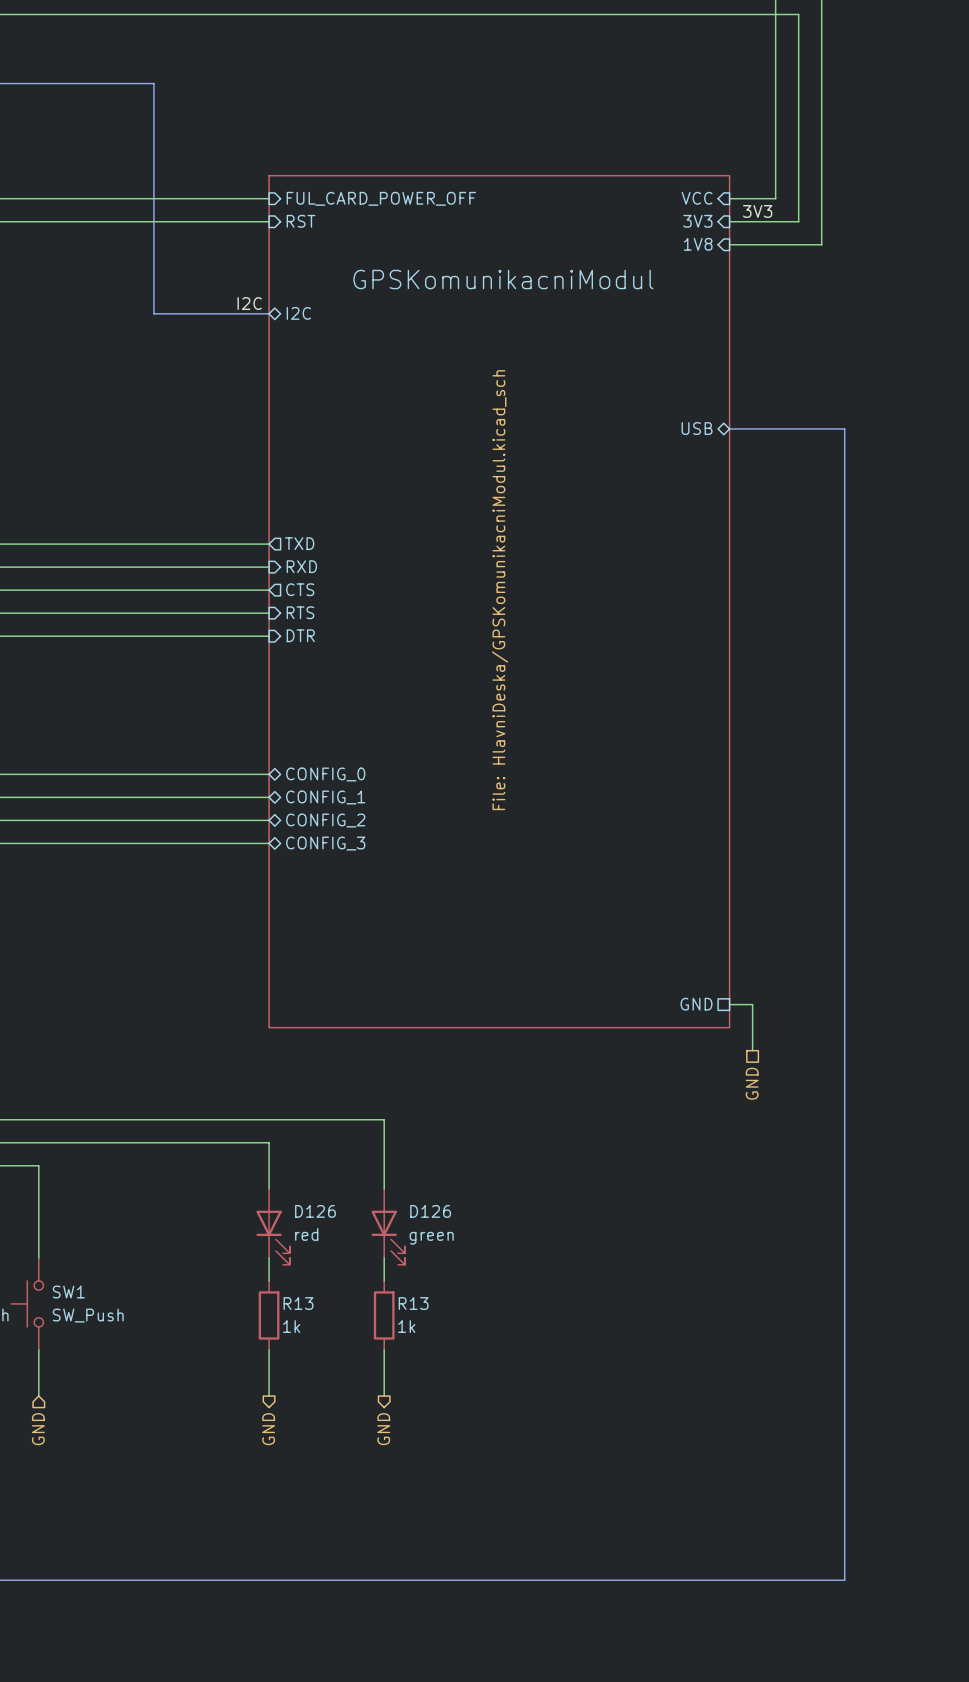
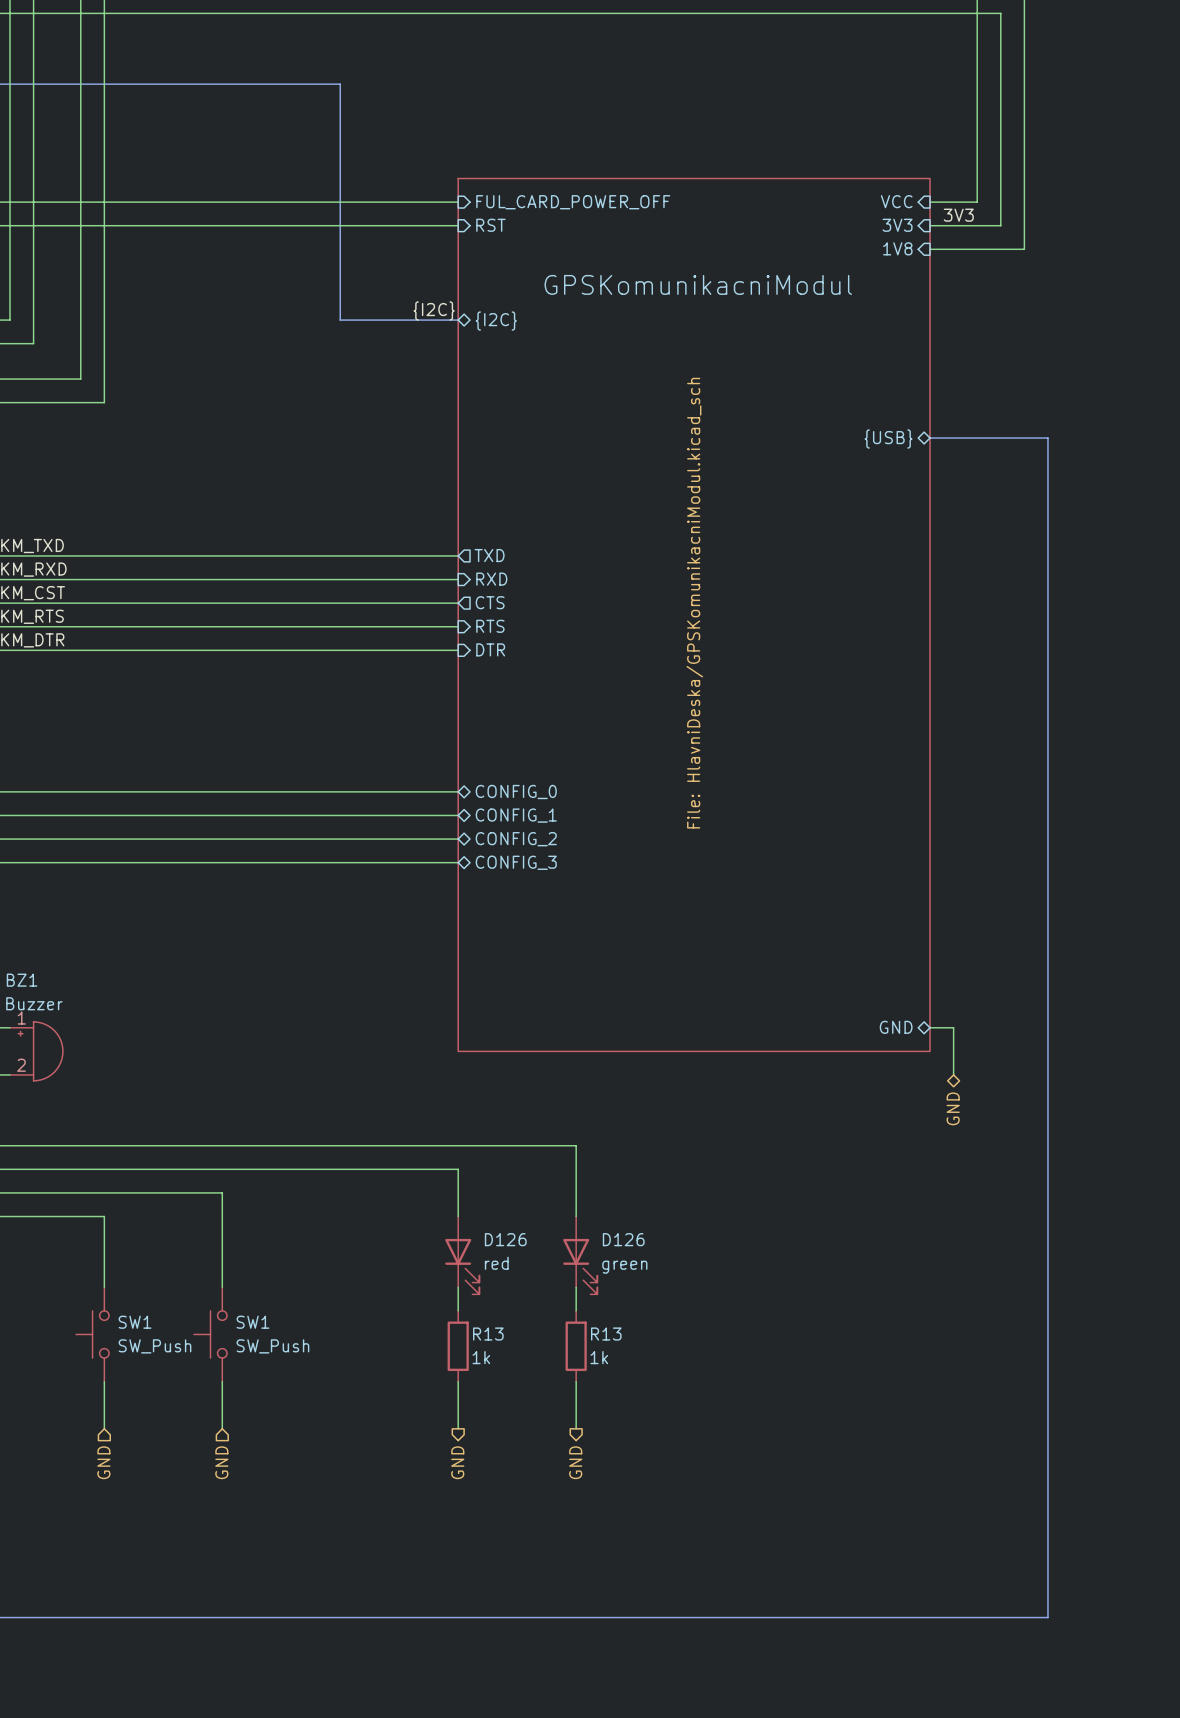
label: I2C (249, 303) -> {I2C} (434, 310)
sheet pin: I2C (298, 313) -> {I2C} (496, 321)
sheet pin: USB (697, 428) -> {USB} (888, 438)
sheet pin shape: passive (696, 1004) -> bidirectional (896, 1027)
hierarchical label shape: passive (752, 1083) -> bidirectional (953, 1108)

